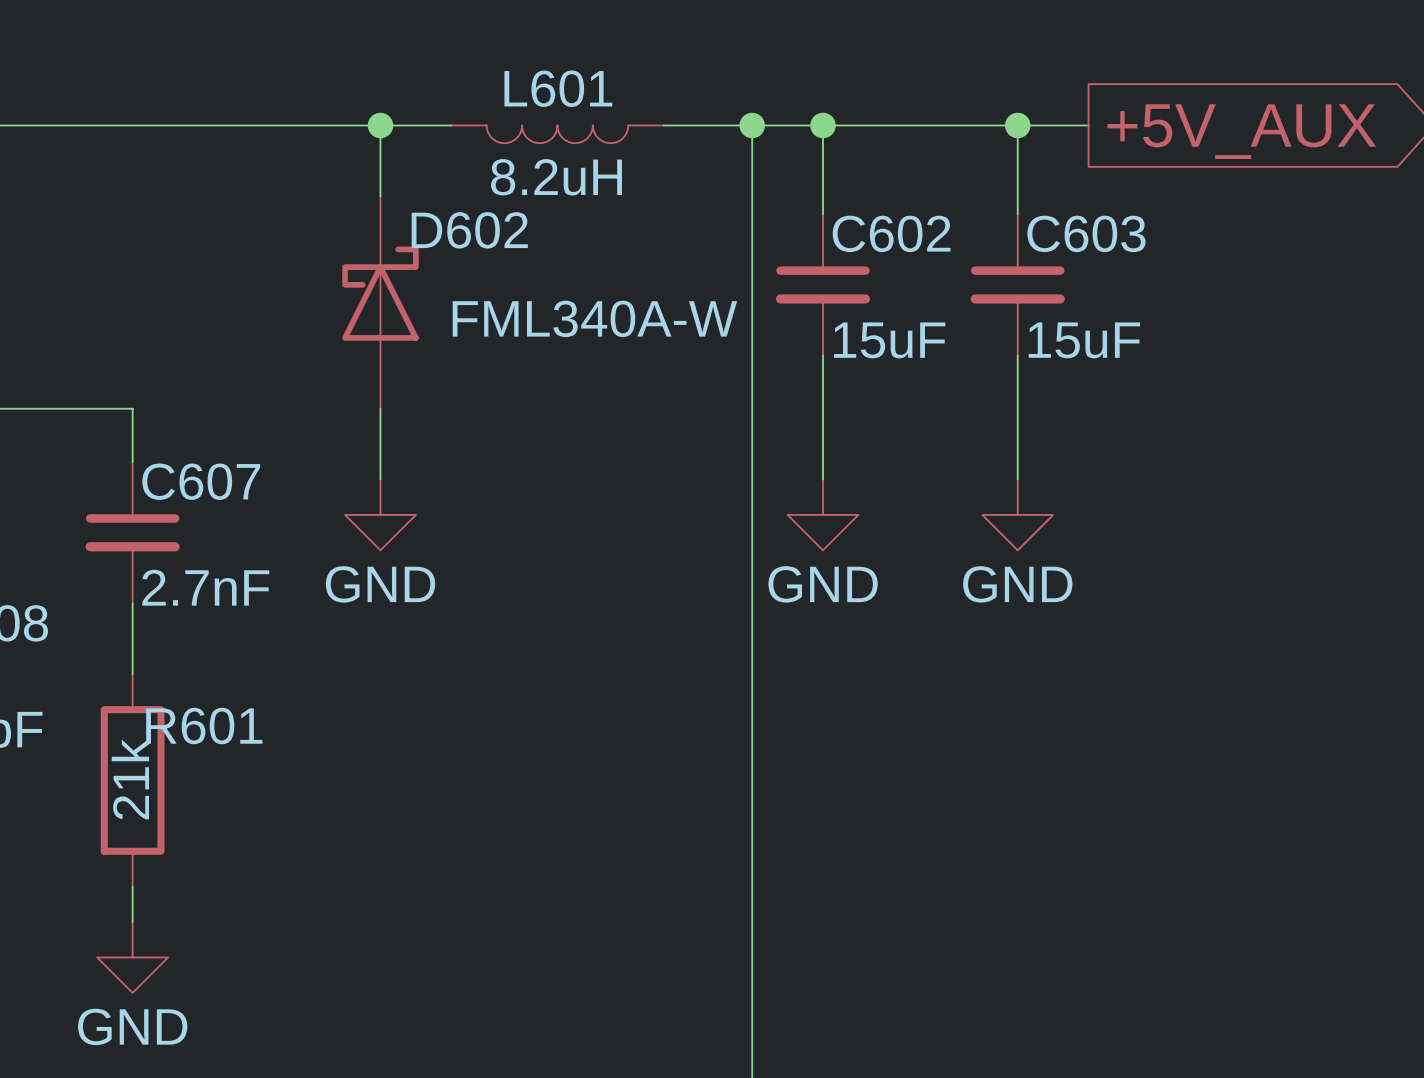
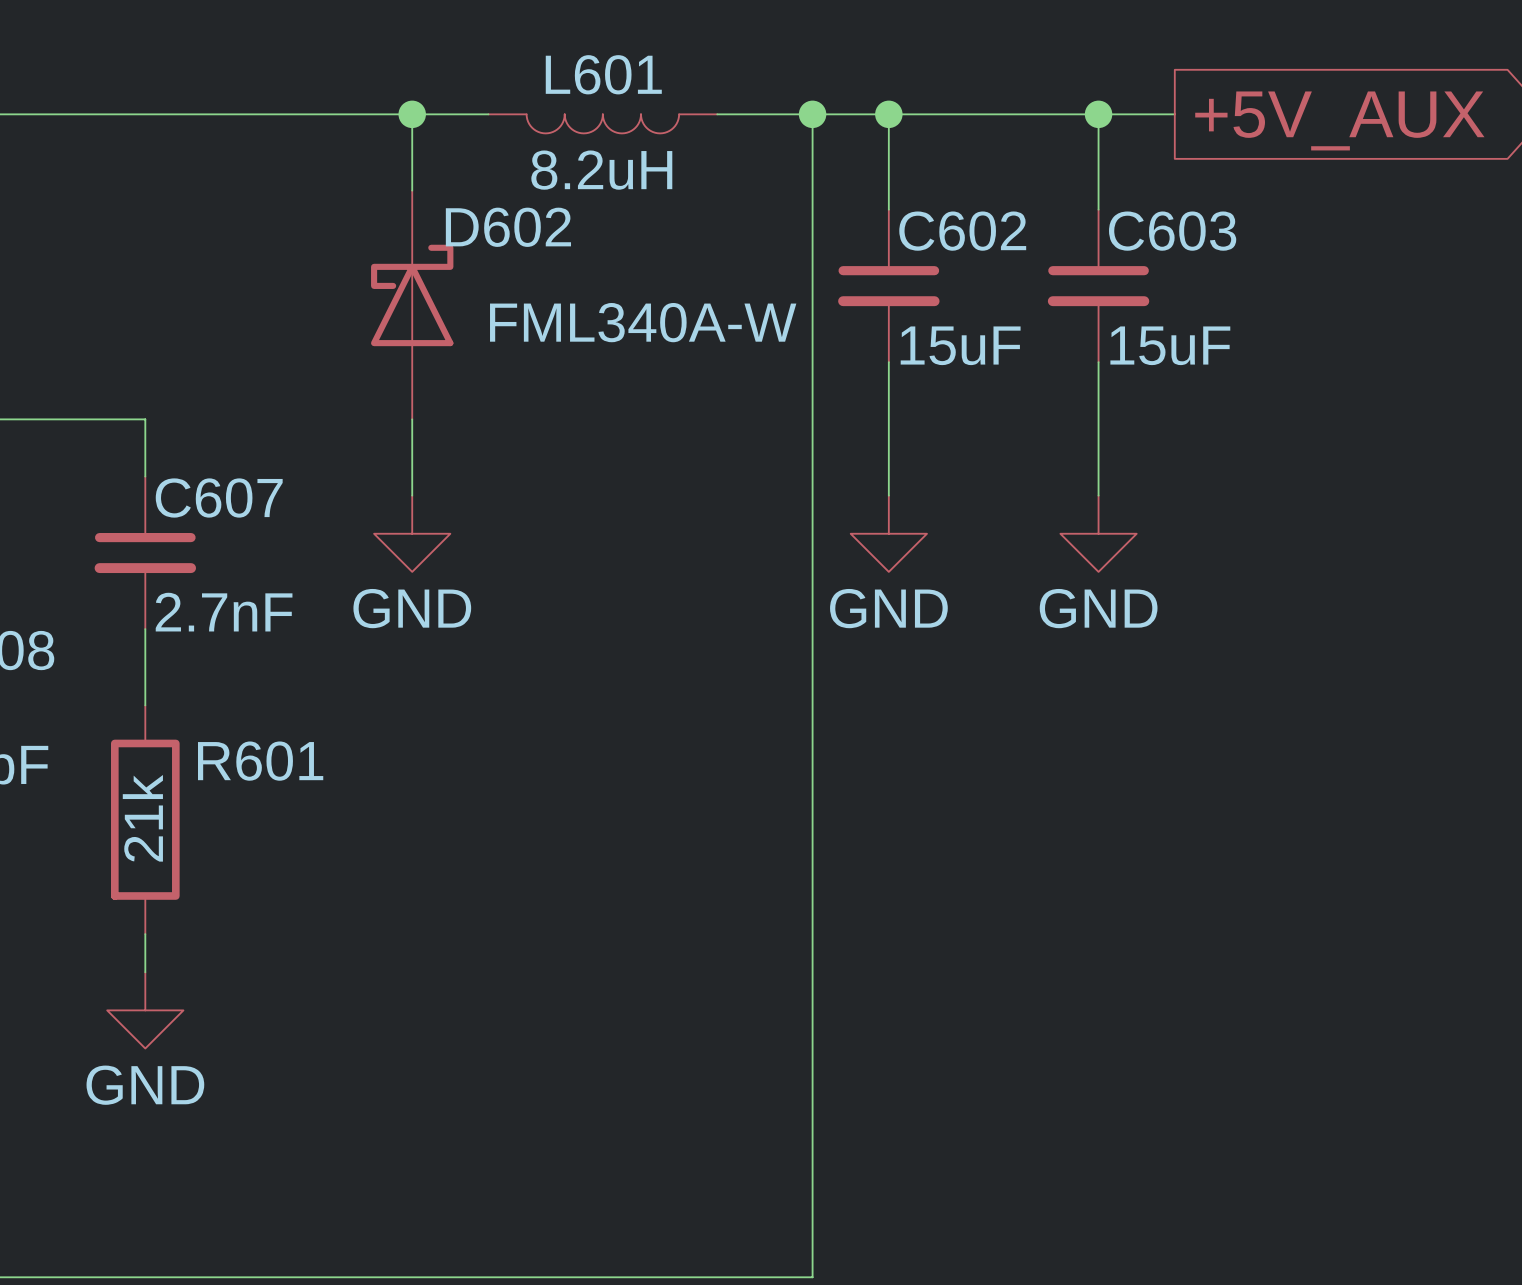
R601 name position: R601 (204, 726) -> R601 (260, 761)

